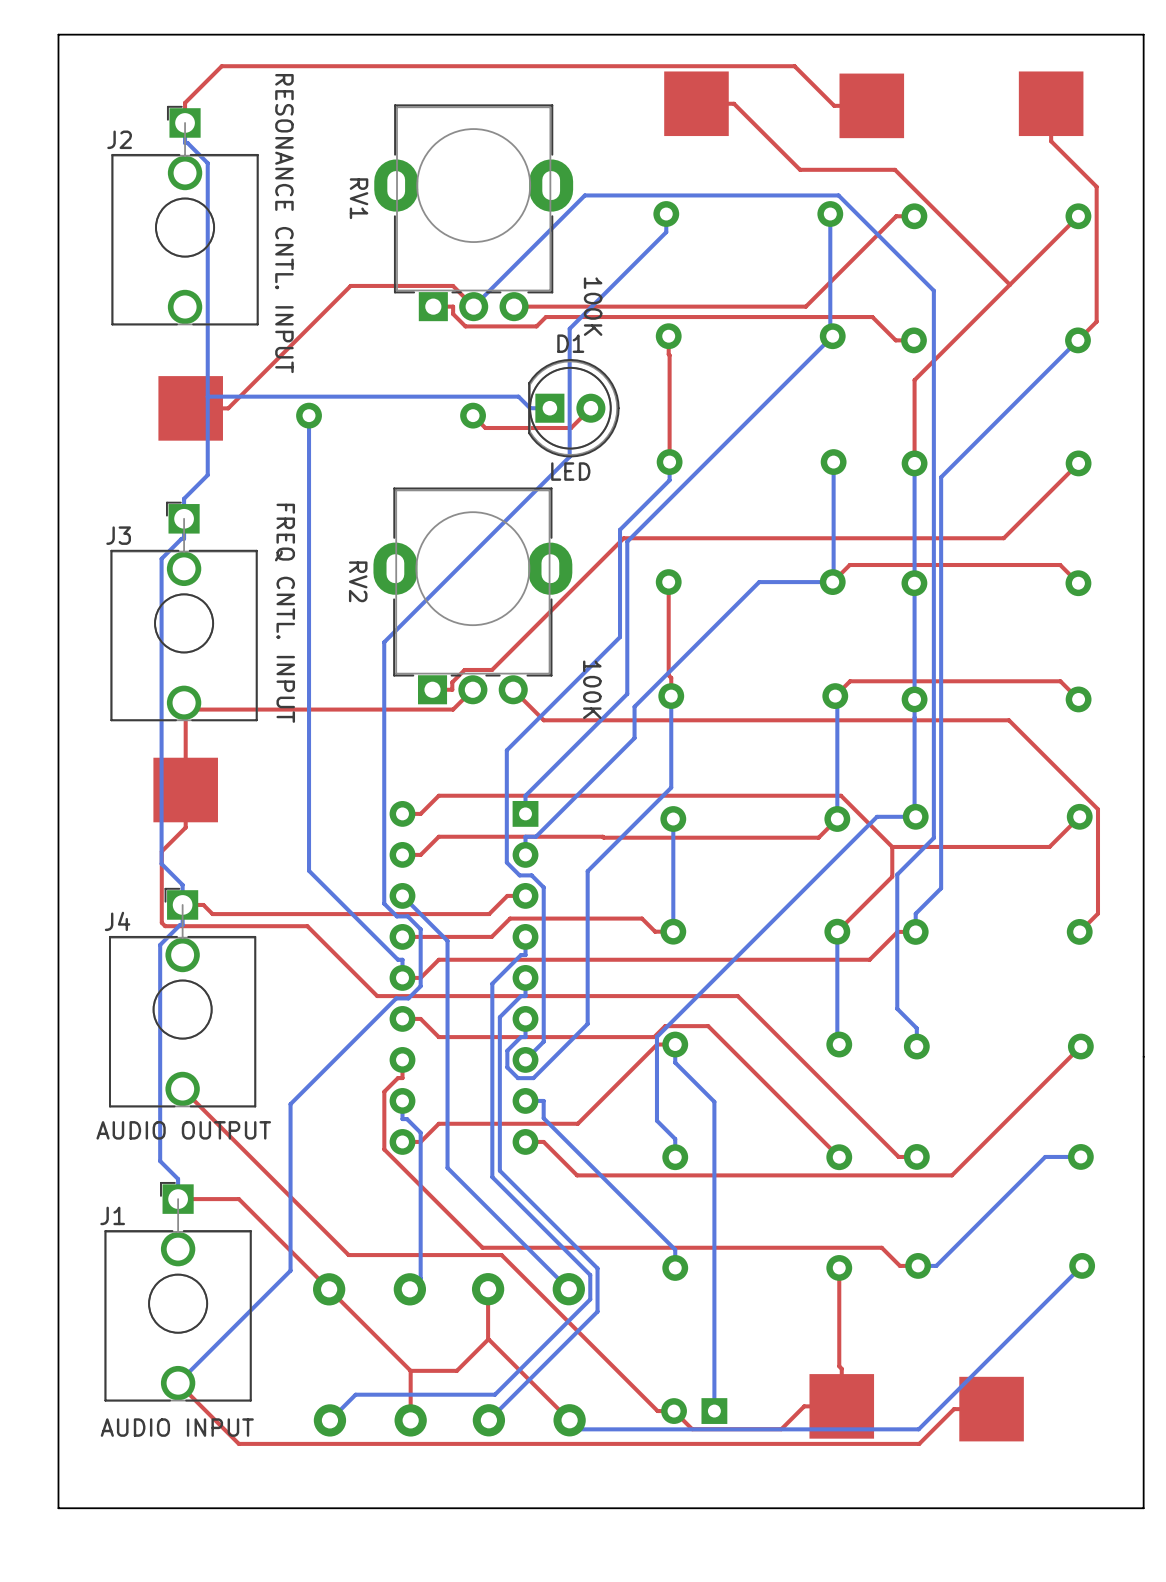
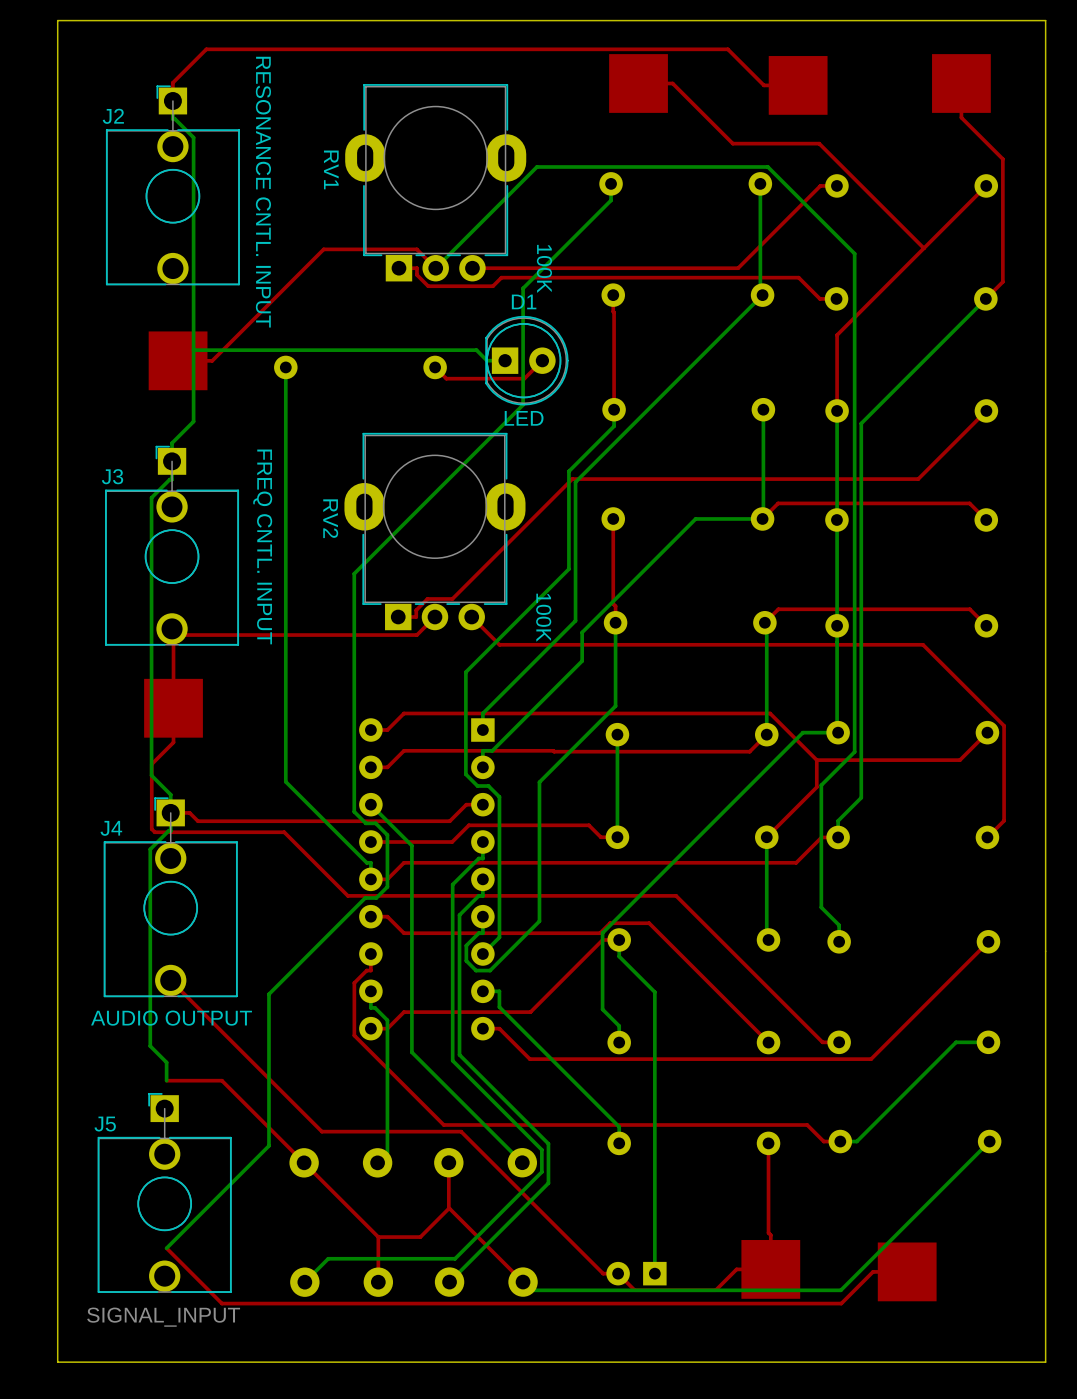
J1: AUDIO INPUT (178, 1291) -> none
J5: none -> SIGNAL_INPUT (164, 1192)

